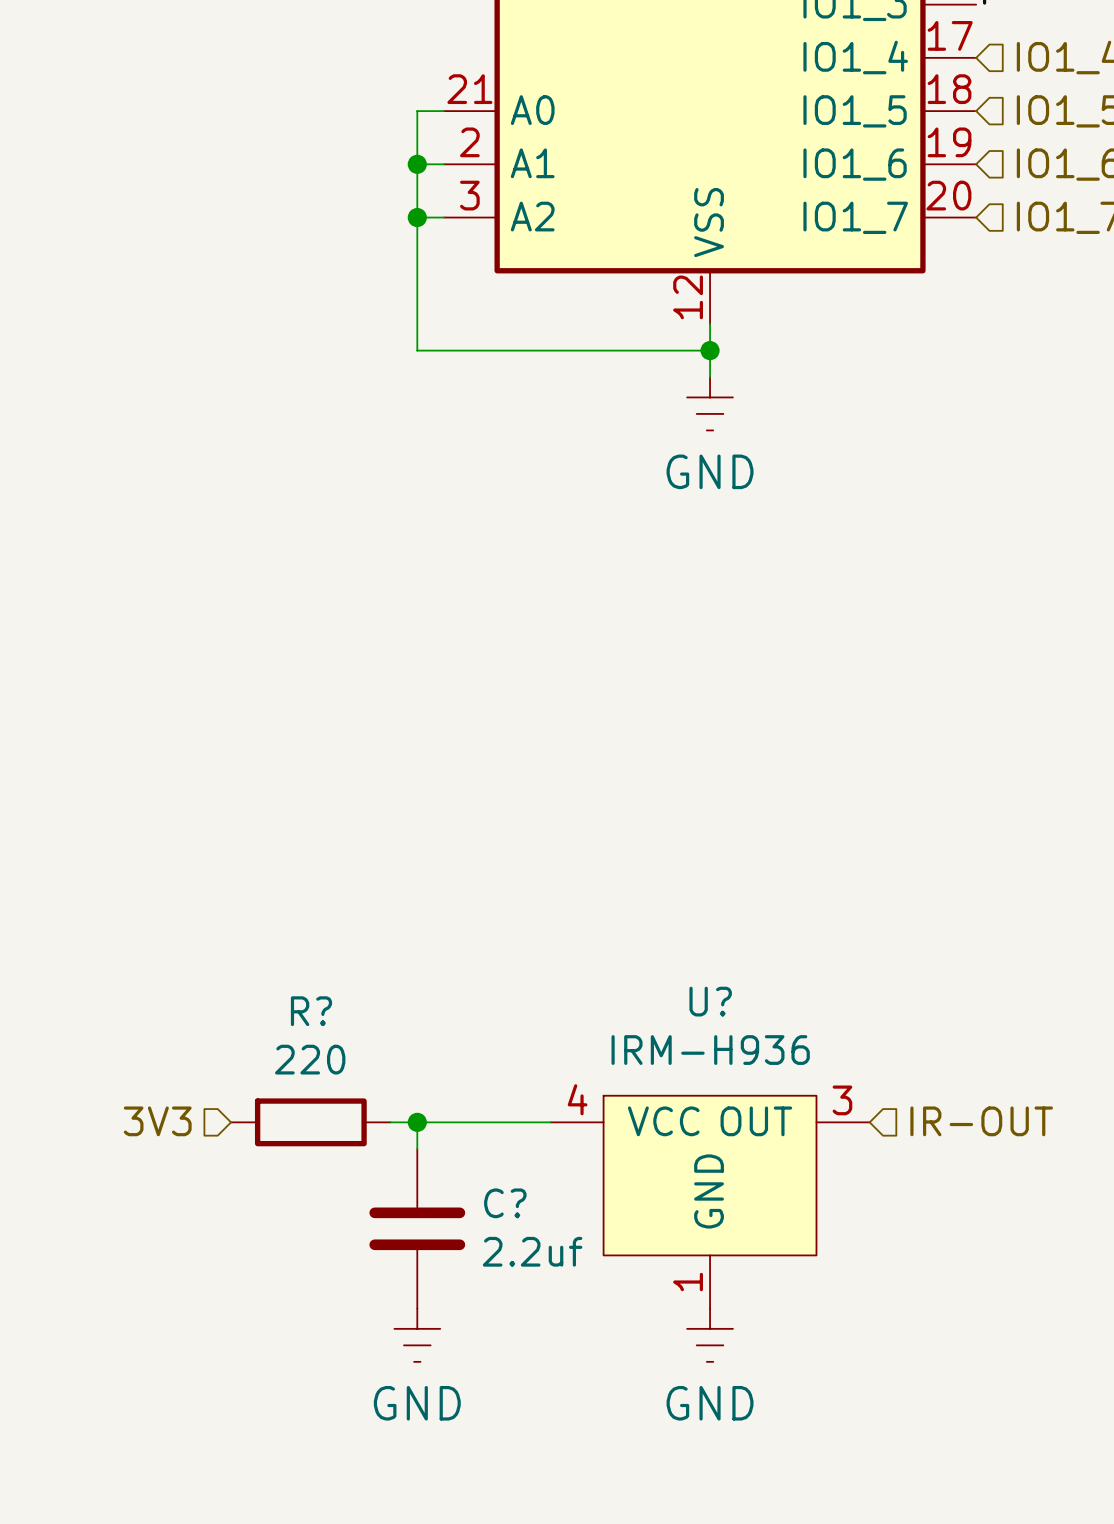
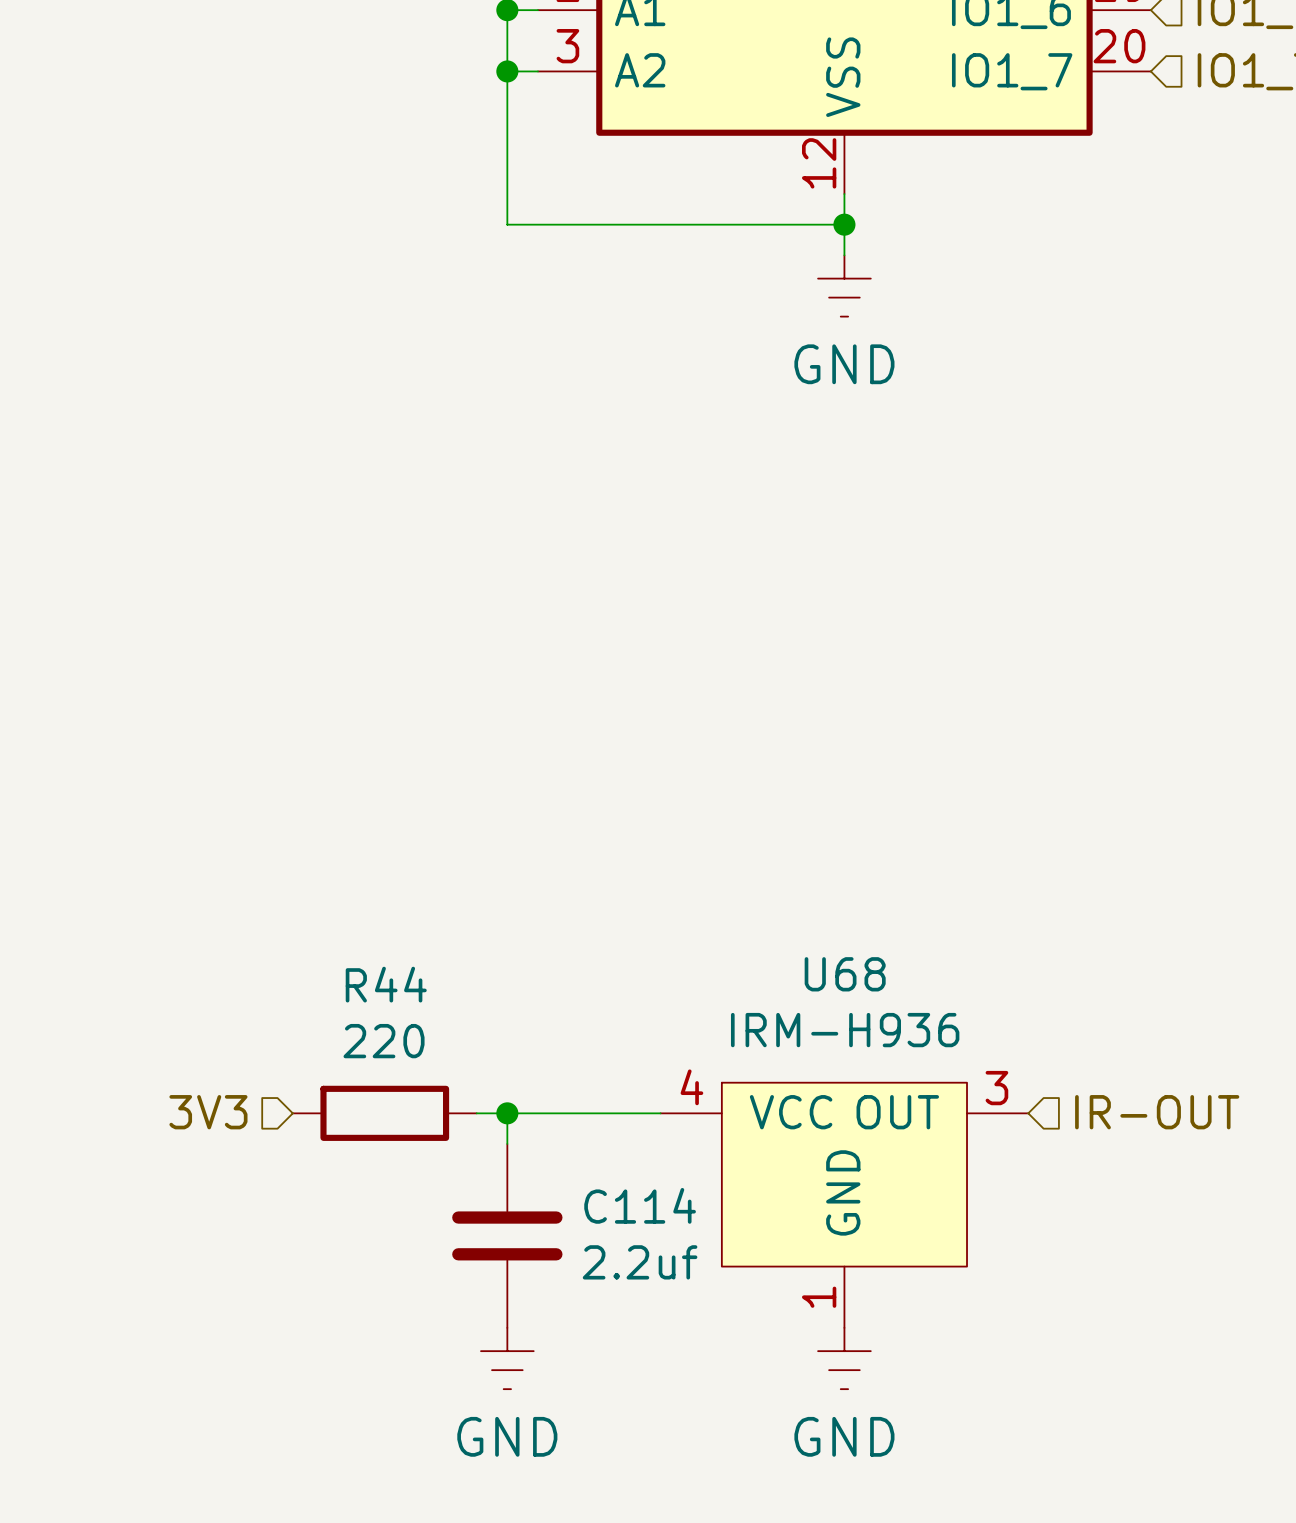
U? name: U? (710, 1001) -> U68 (845, 974)
R? name: R? (311, 1011) -> R44 (386, 984)
C? name: C? (505, 1203) -> C114 (640, 1205)

